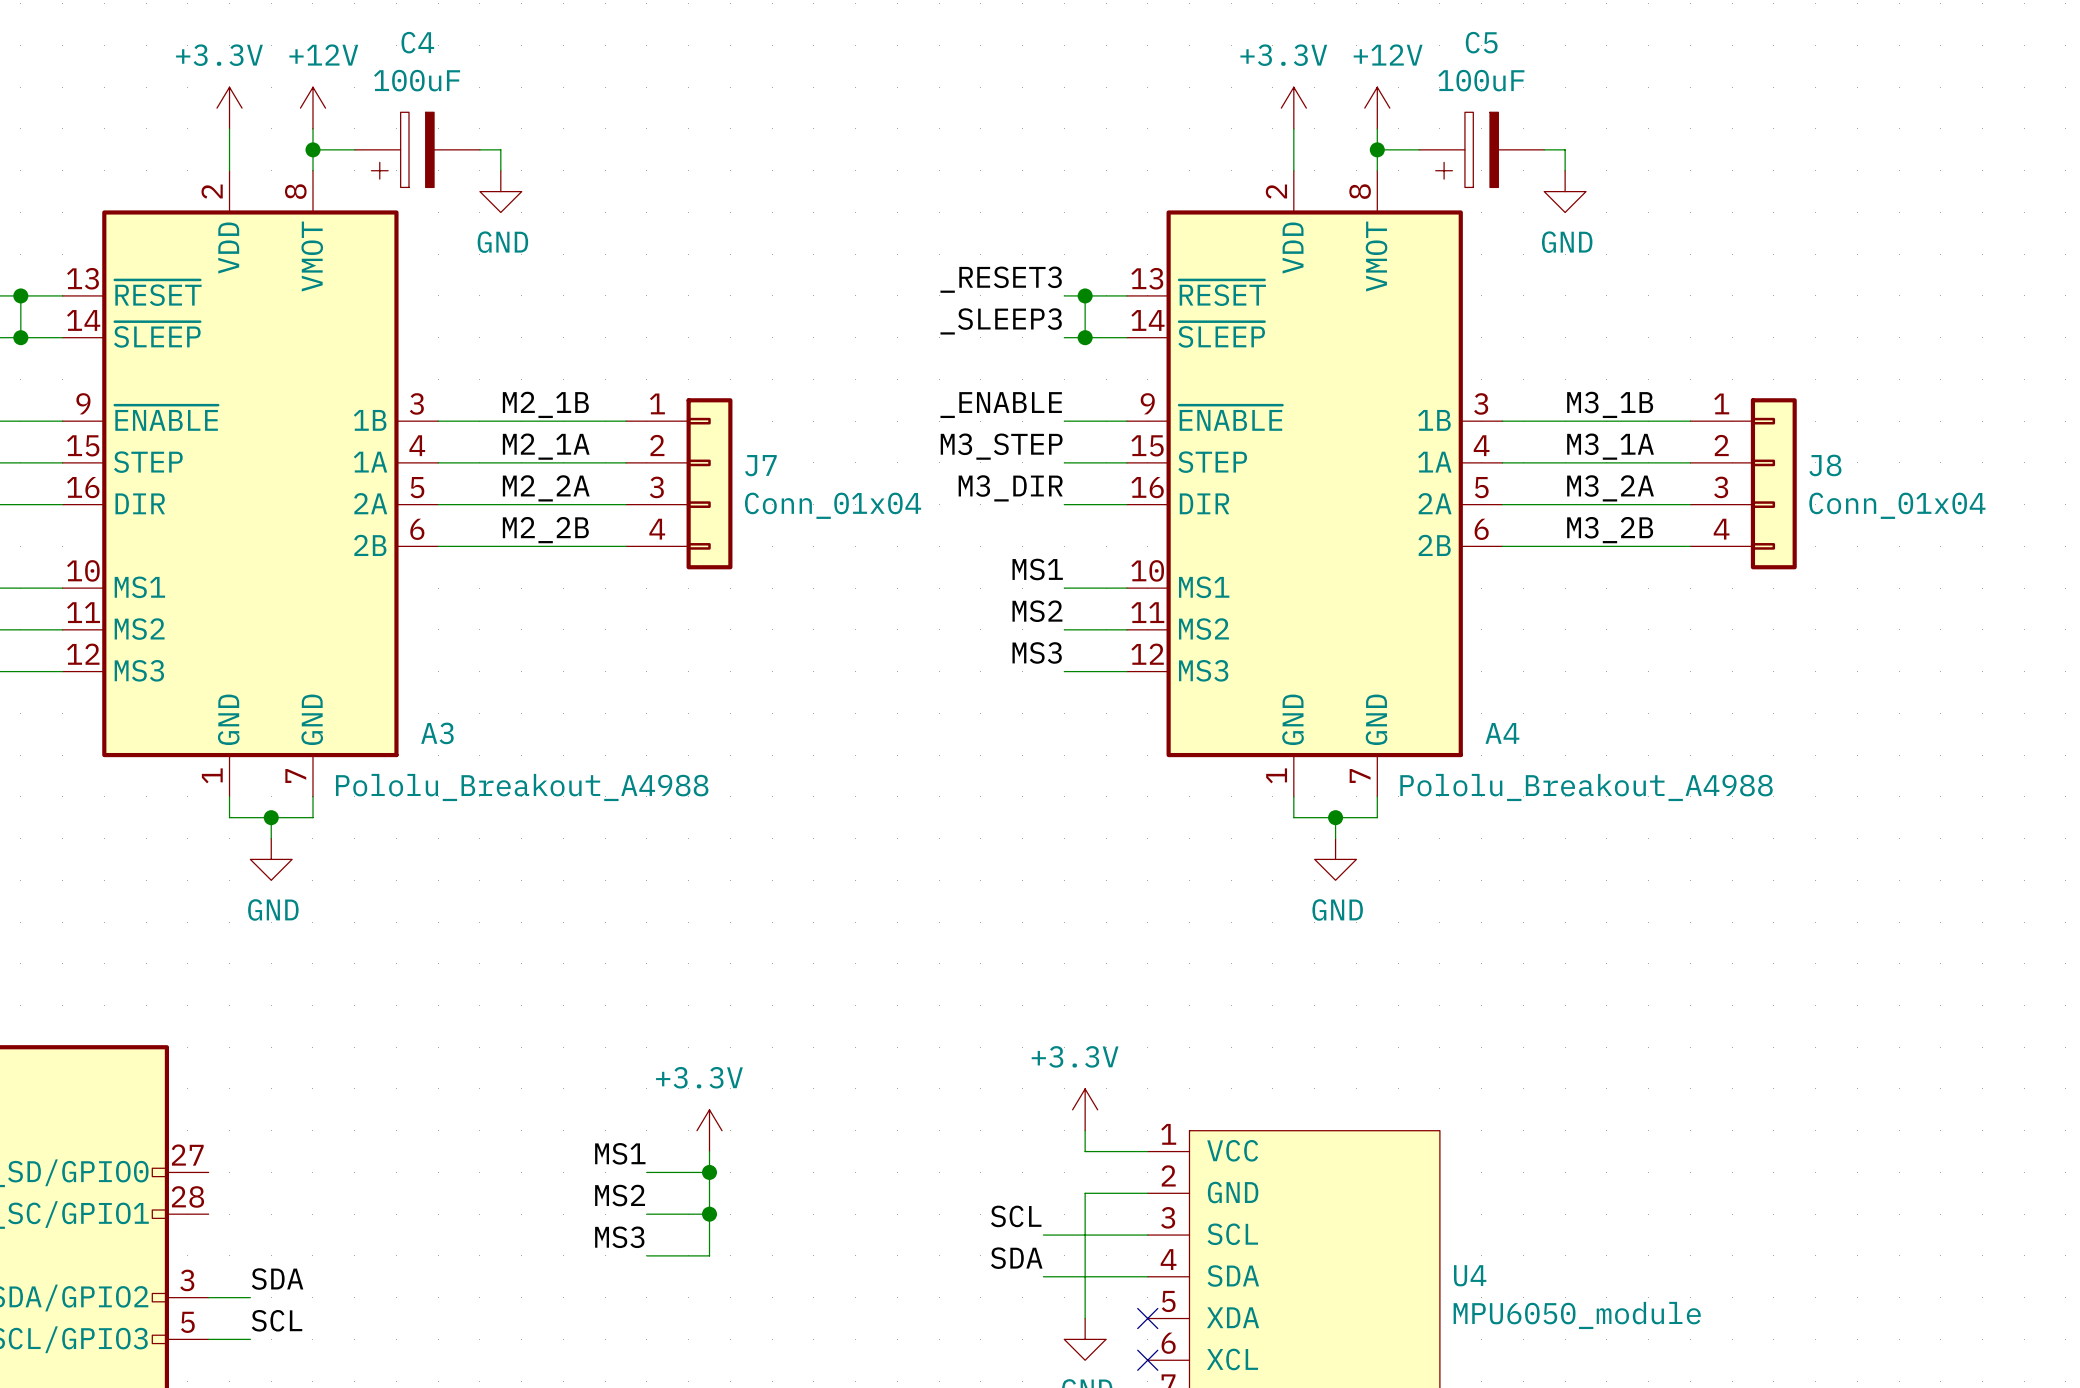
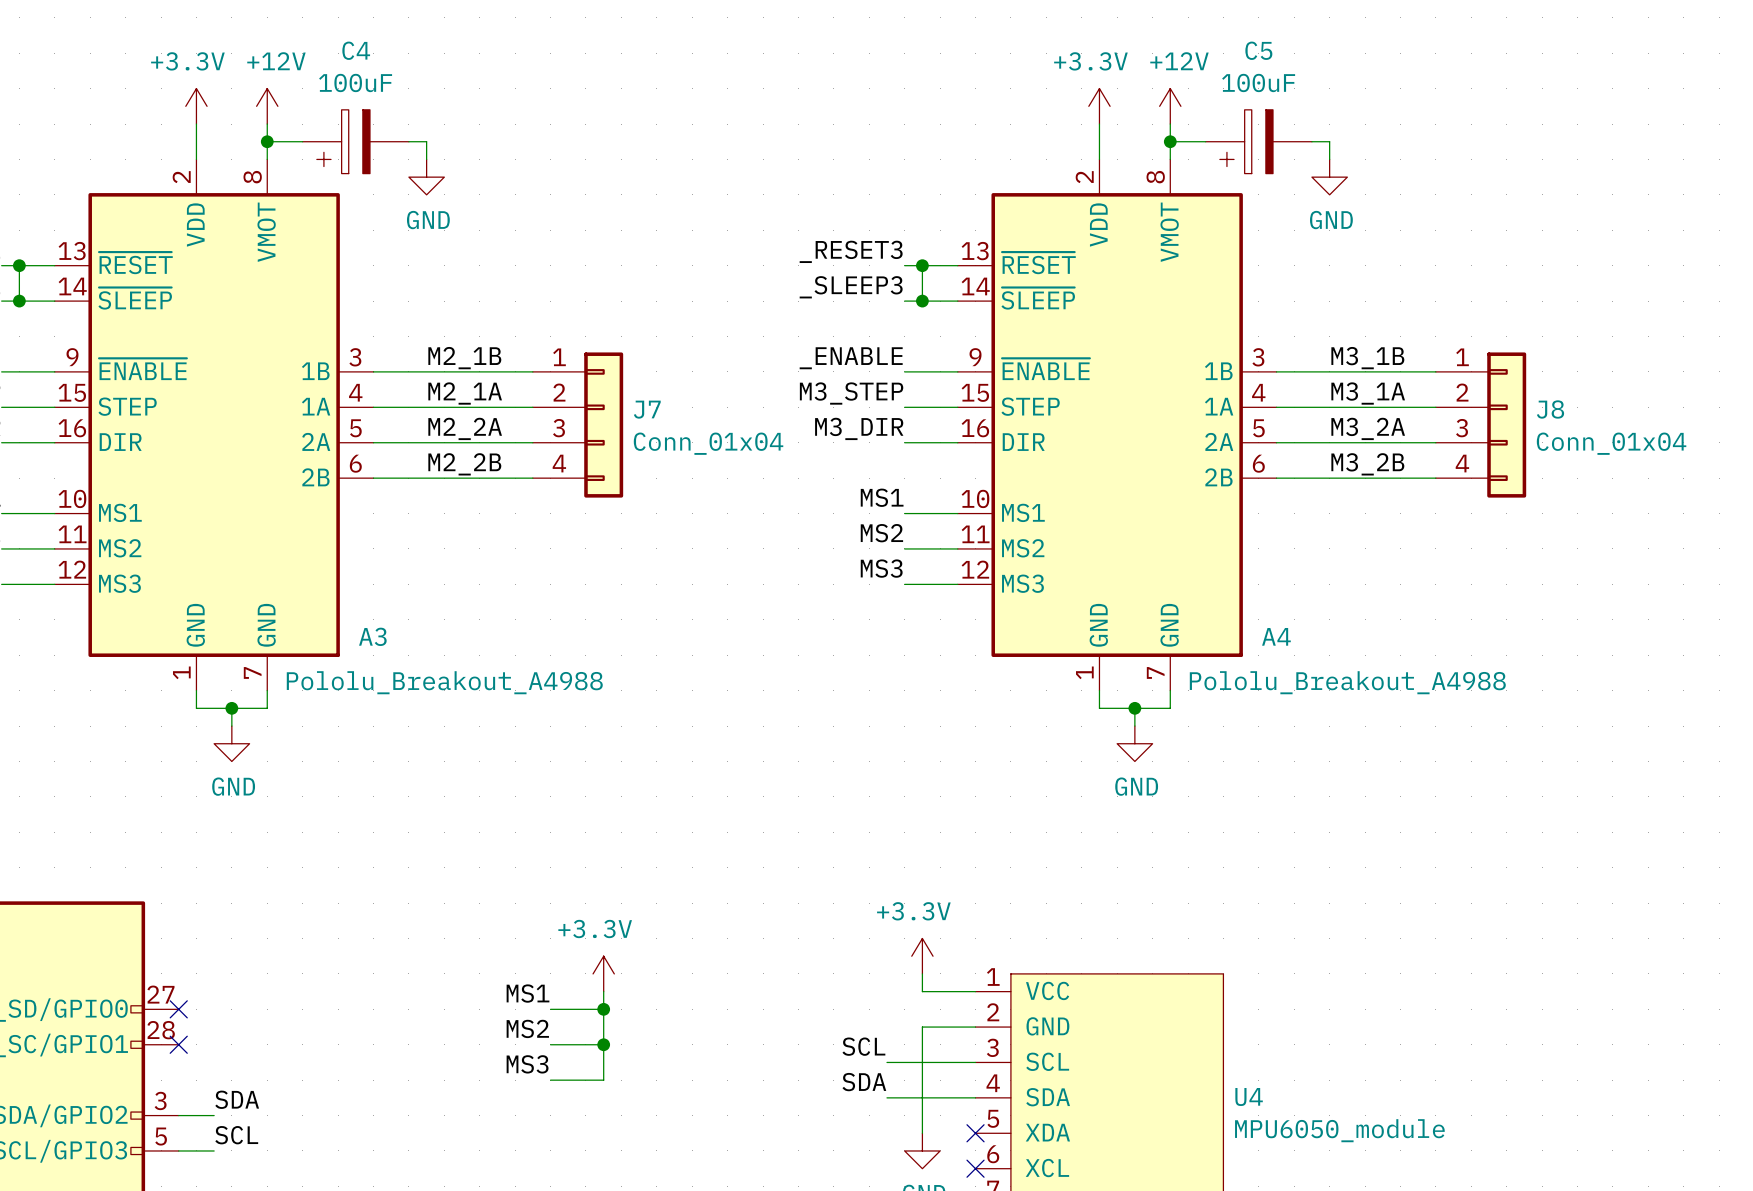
no-connect mark: none -> (178, 1009)
no-connect mark: none -> (178, 1044)

